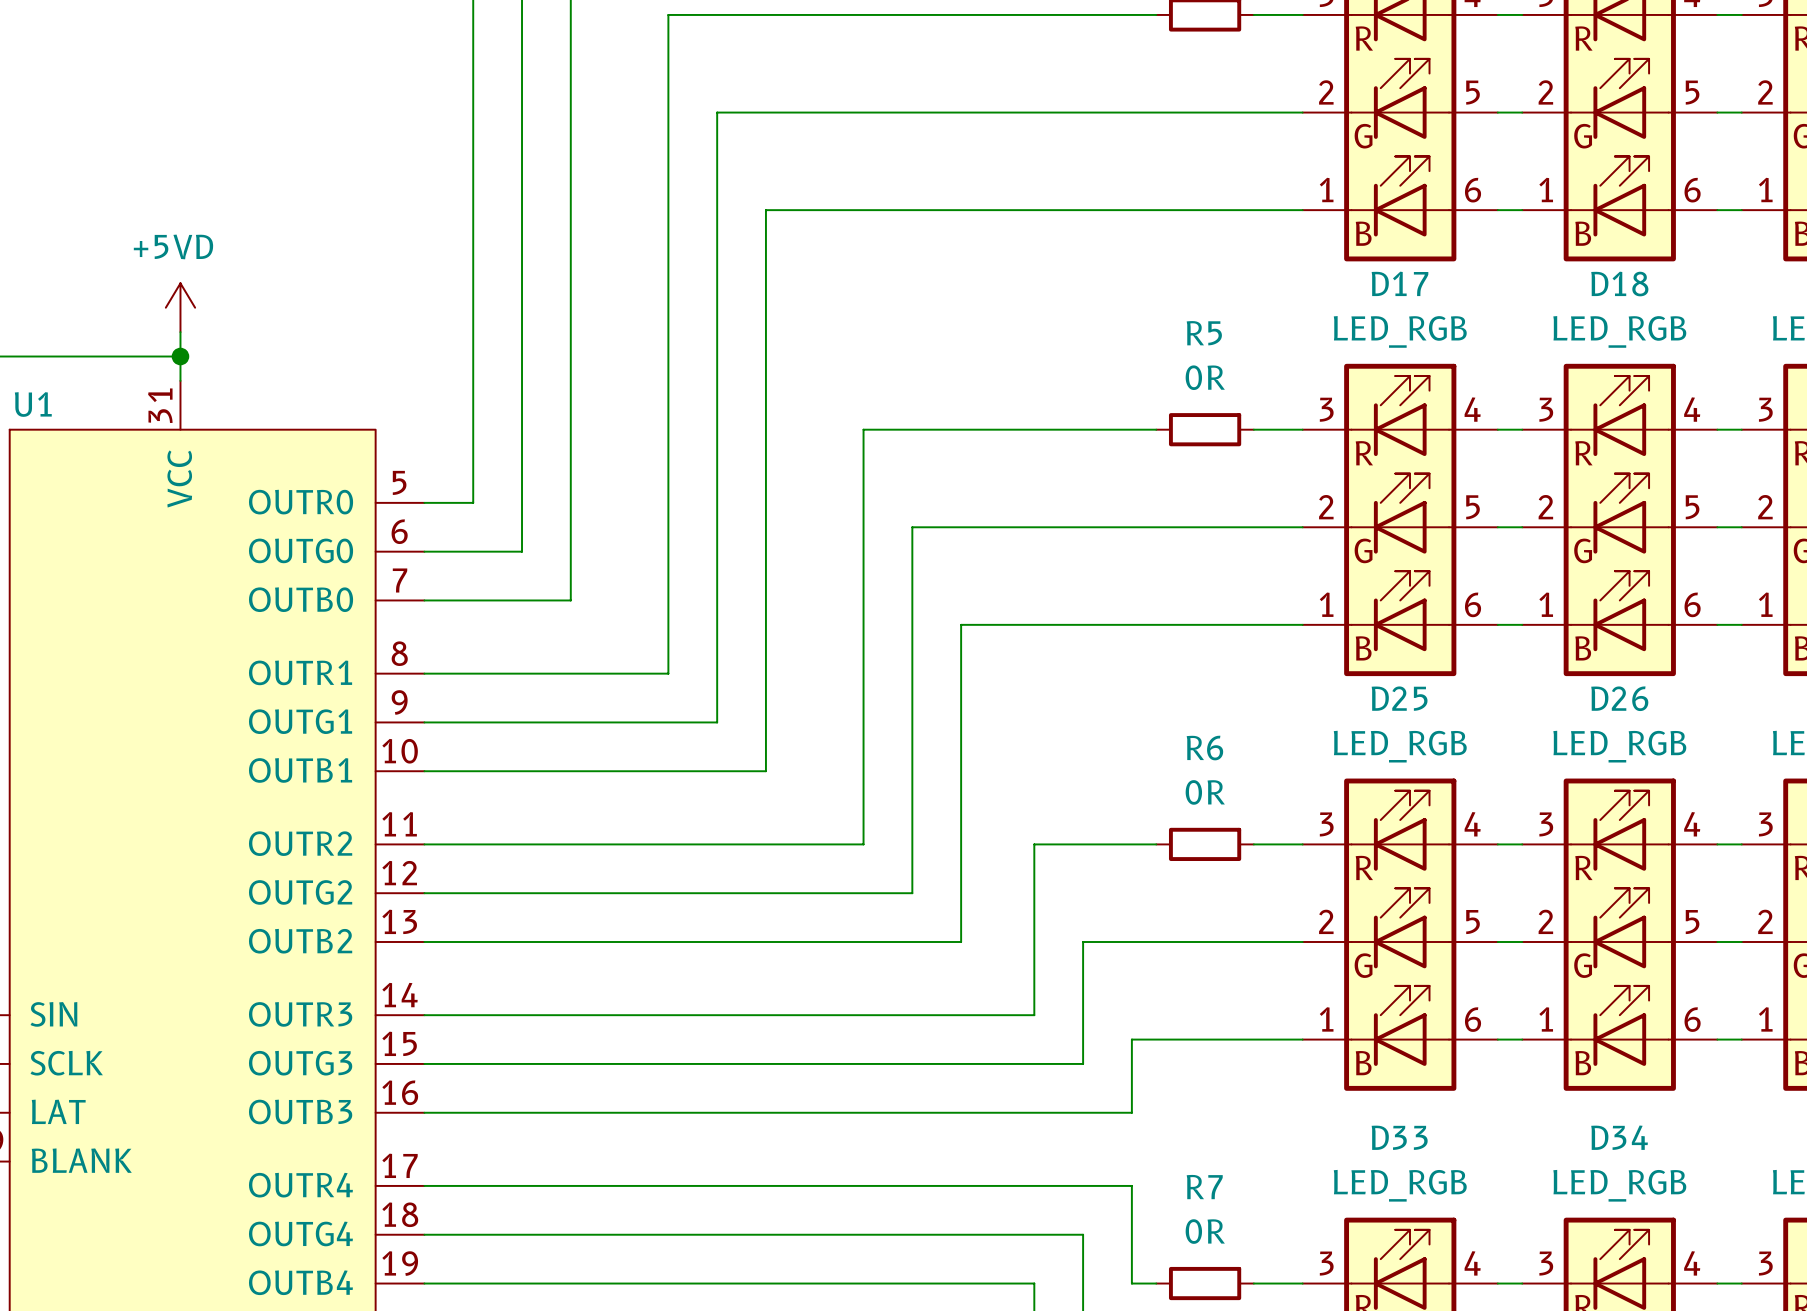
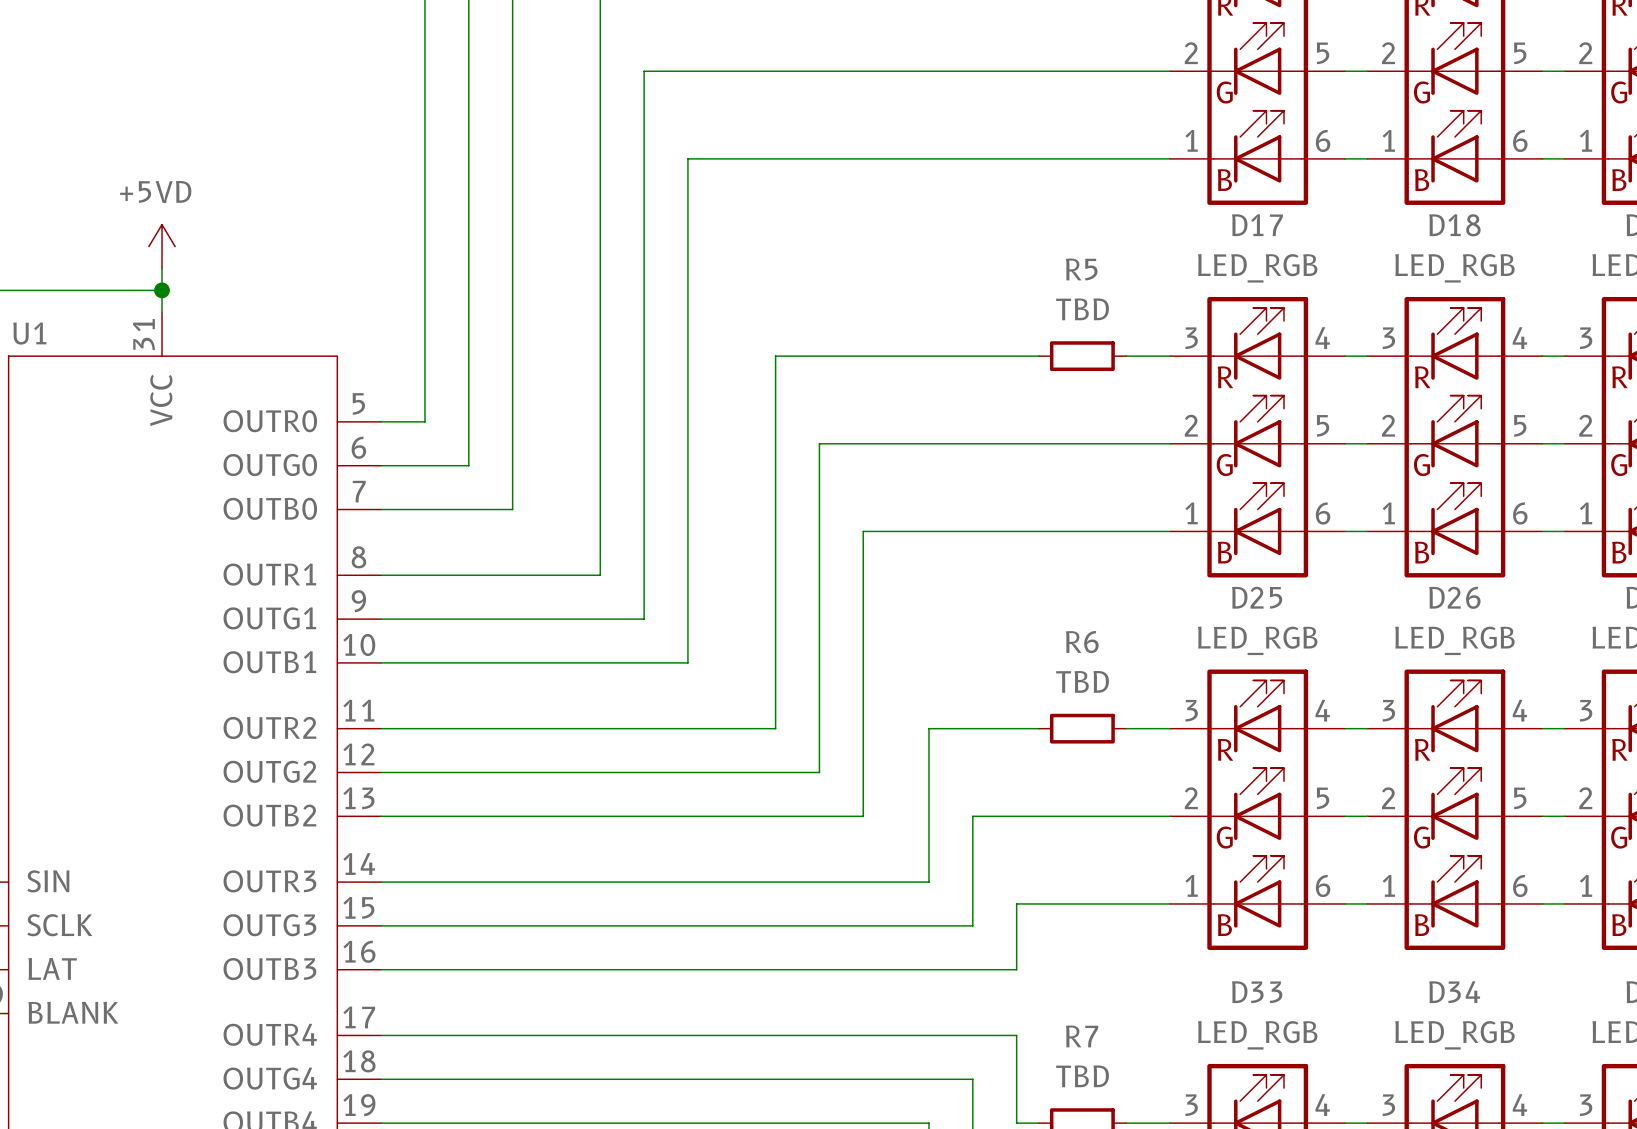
R5 value: 0R (1205, 377) -> TBD (1082, 309)
R6 value: 0R (1205, 792) -> TBD (1082, 681)
R7 value: 0R (1205, 1231) -> TBD (1082, 1076)

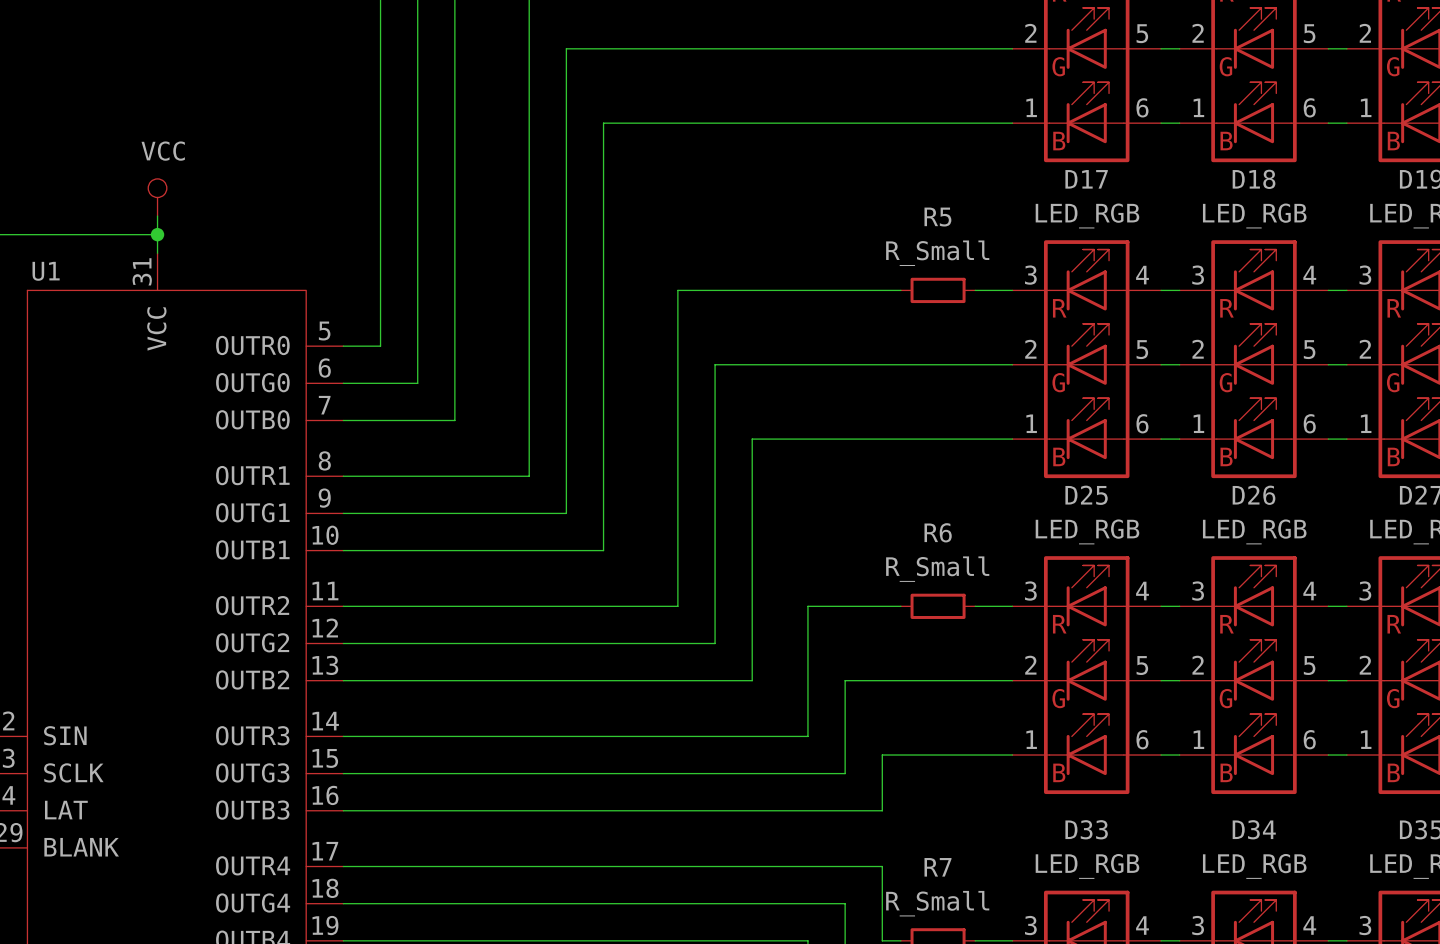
power symbol: +5VD (162, 246) -> VCC (157, 197)
R5 value: TBD (1082, 309) -> R_Small (937, 253)
R6 value: TBD (1082, 681) -> R_Small (937, 569)
R7 value: TBD (1082, 1076) -> R_Small (937, 903)

